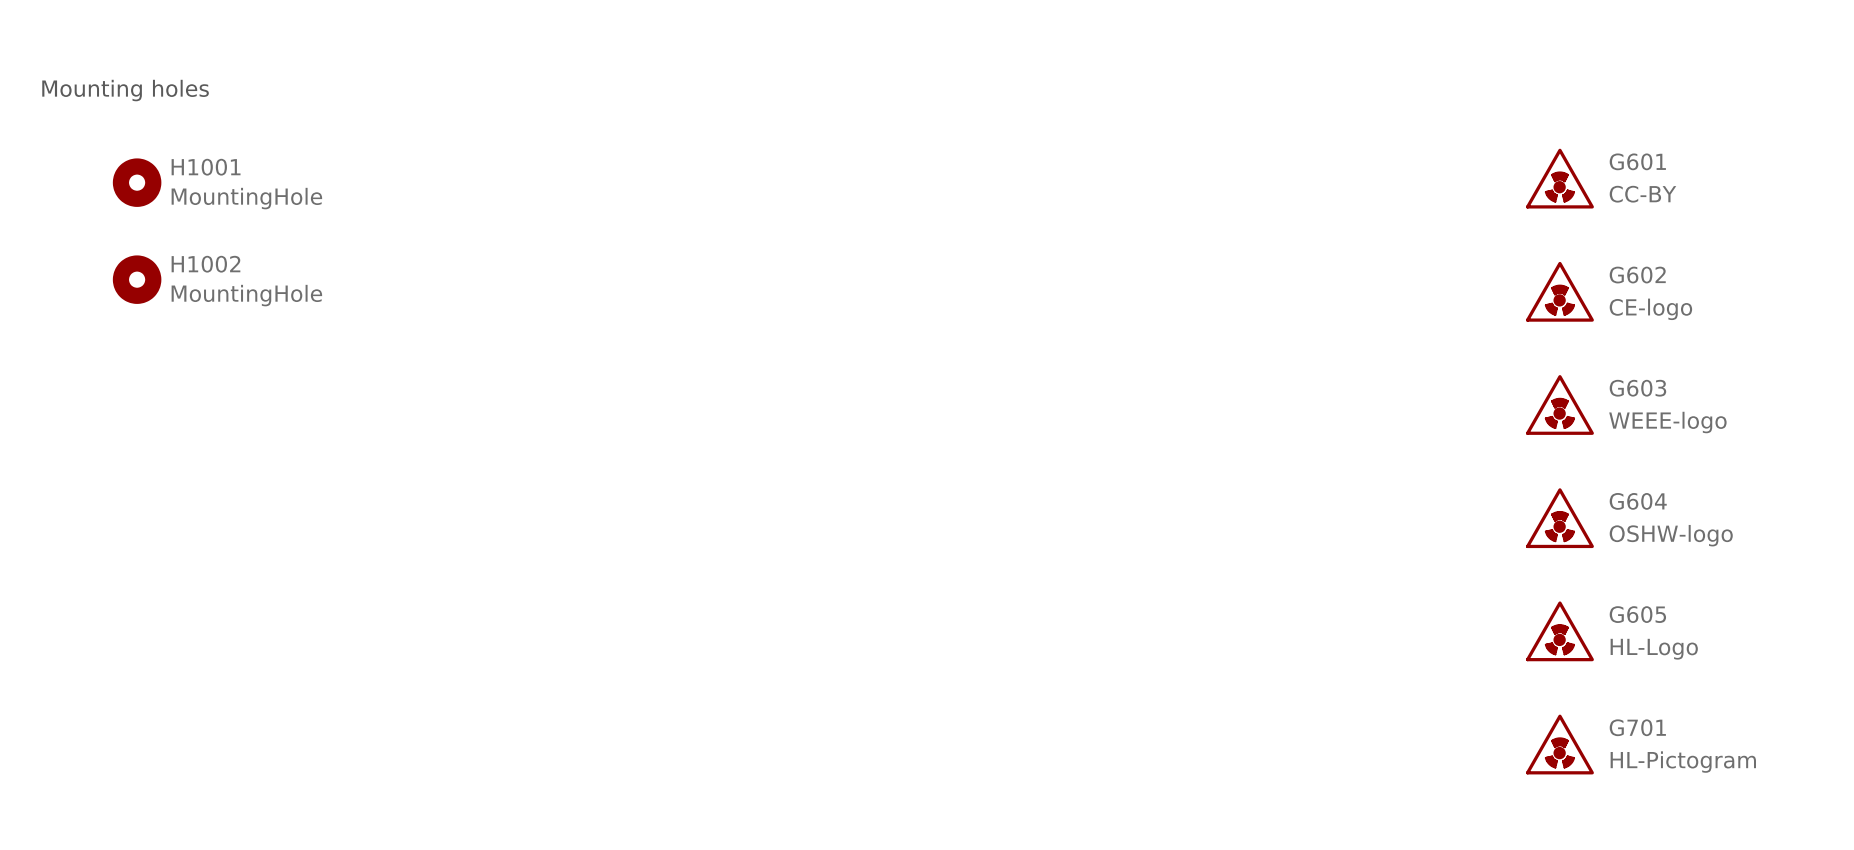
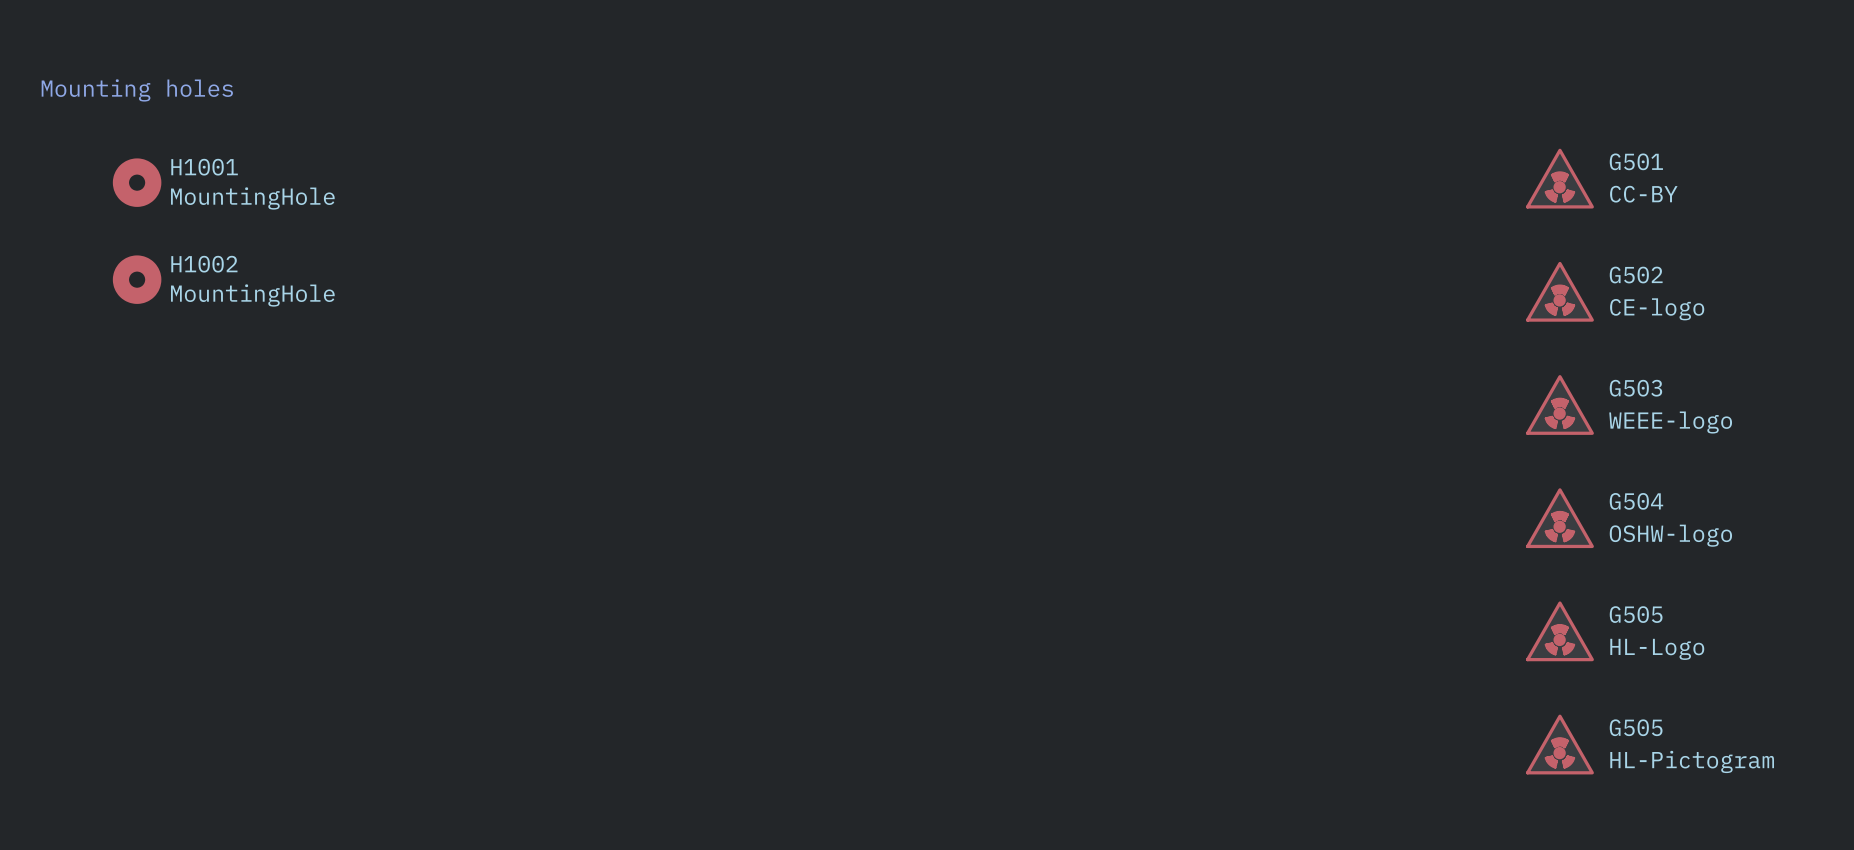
G601 name: G601 (1637, 161) -> G501 (1636, 161)
G602 name: G602 (1637, 275) -> G502 (1636, 275)
G603 name: G603 (1637, 388) -> G503 (1635, 388)
G604 name: G604 (1638, 501) -> G504 (1636, 501)
G605 name: G605 (1637, 614) -> G505 (1636, 614)
G701 name: G701 (1637, 727) -> G505 (1636, 727)

